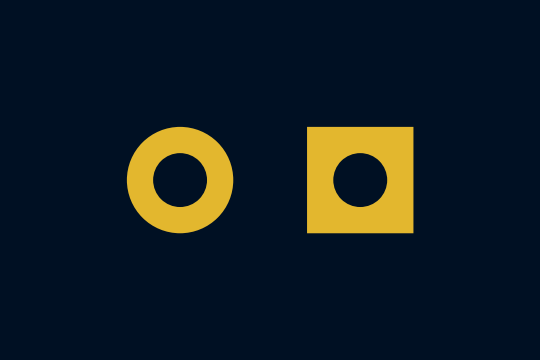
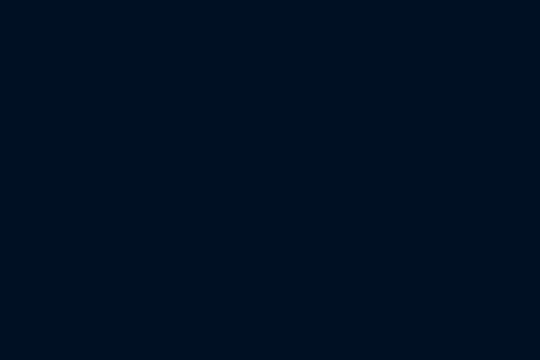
part: (270, 180) -> none

